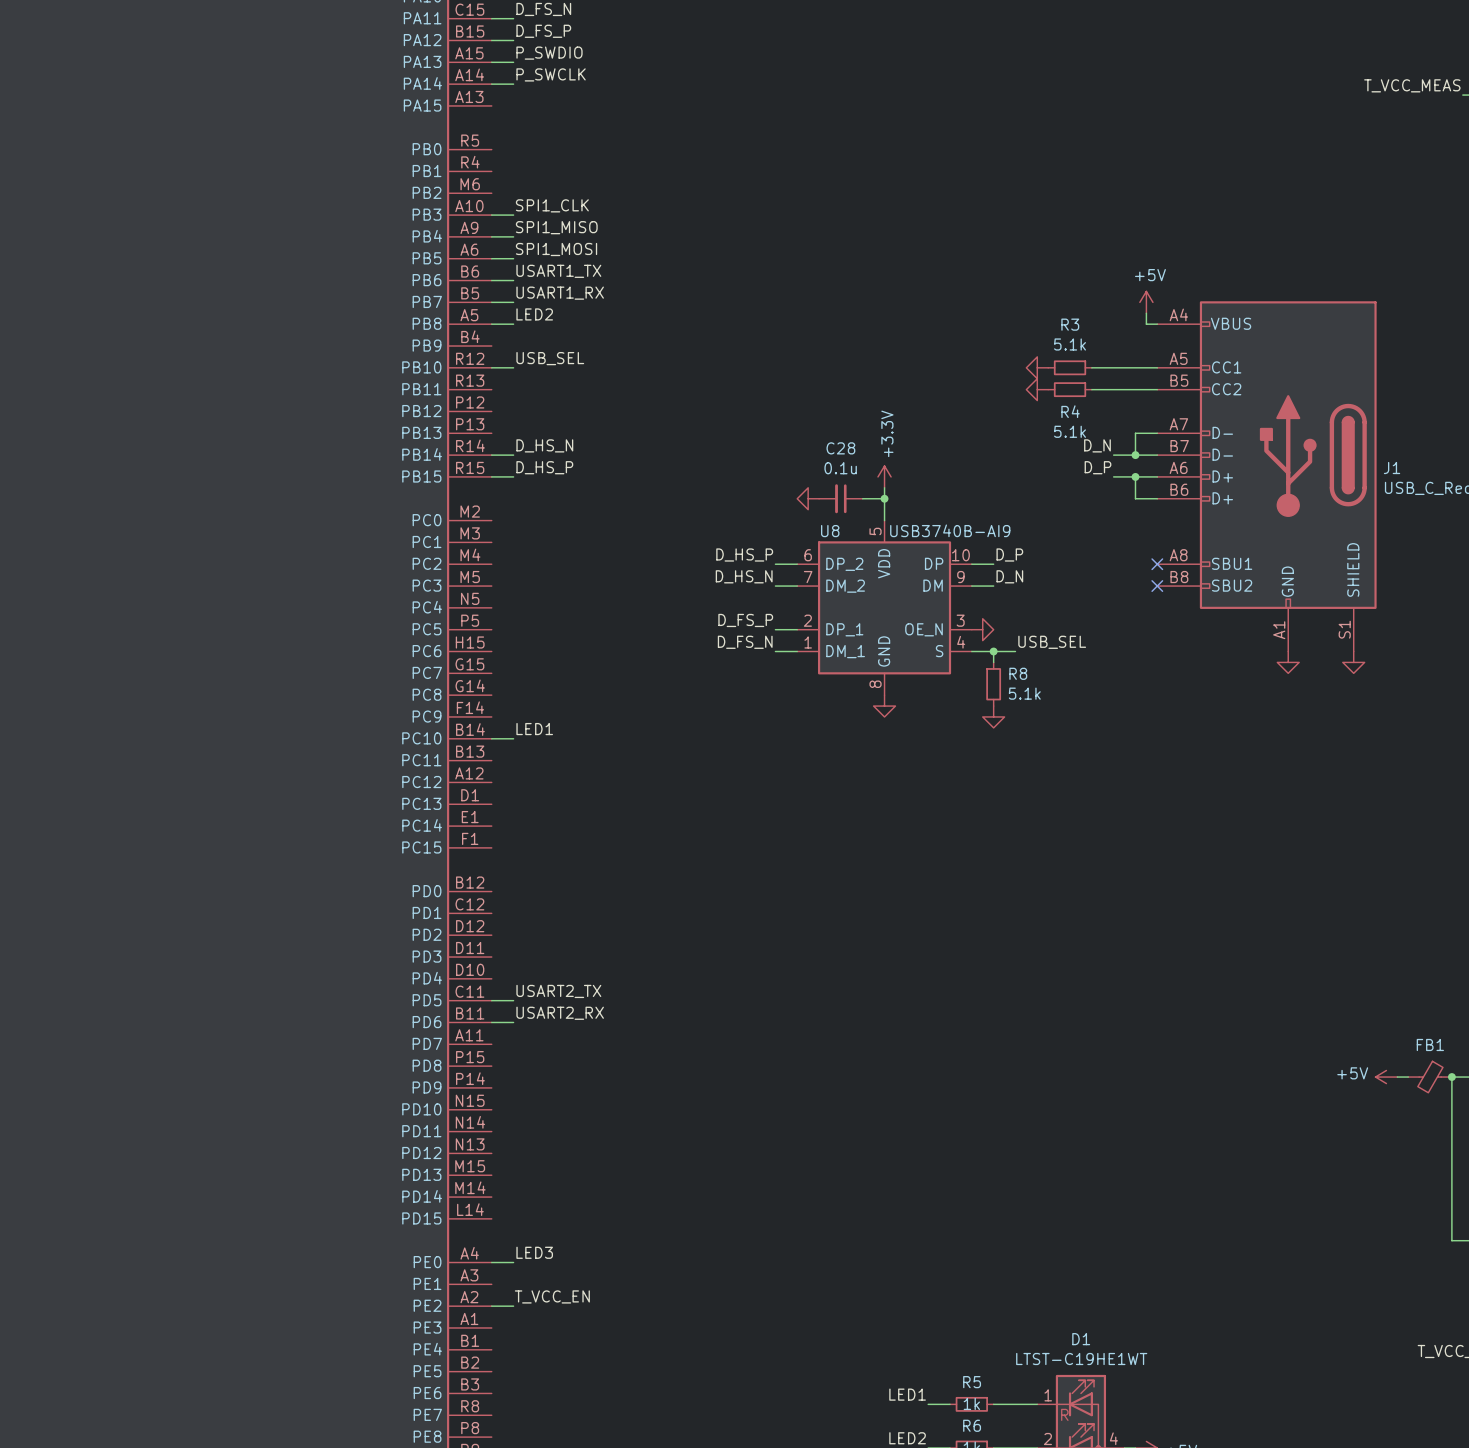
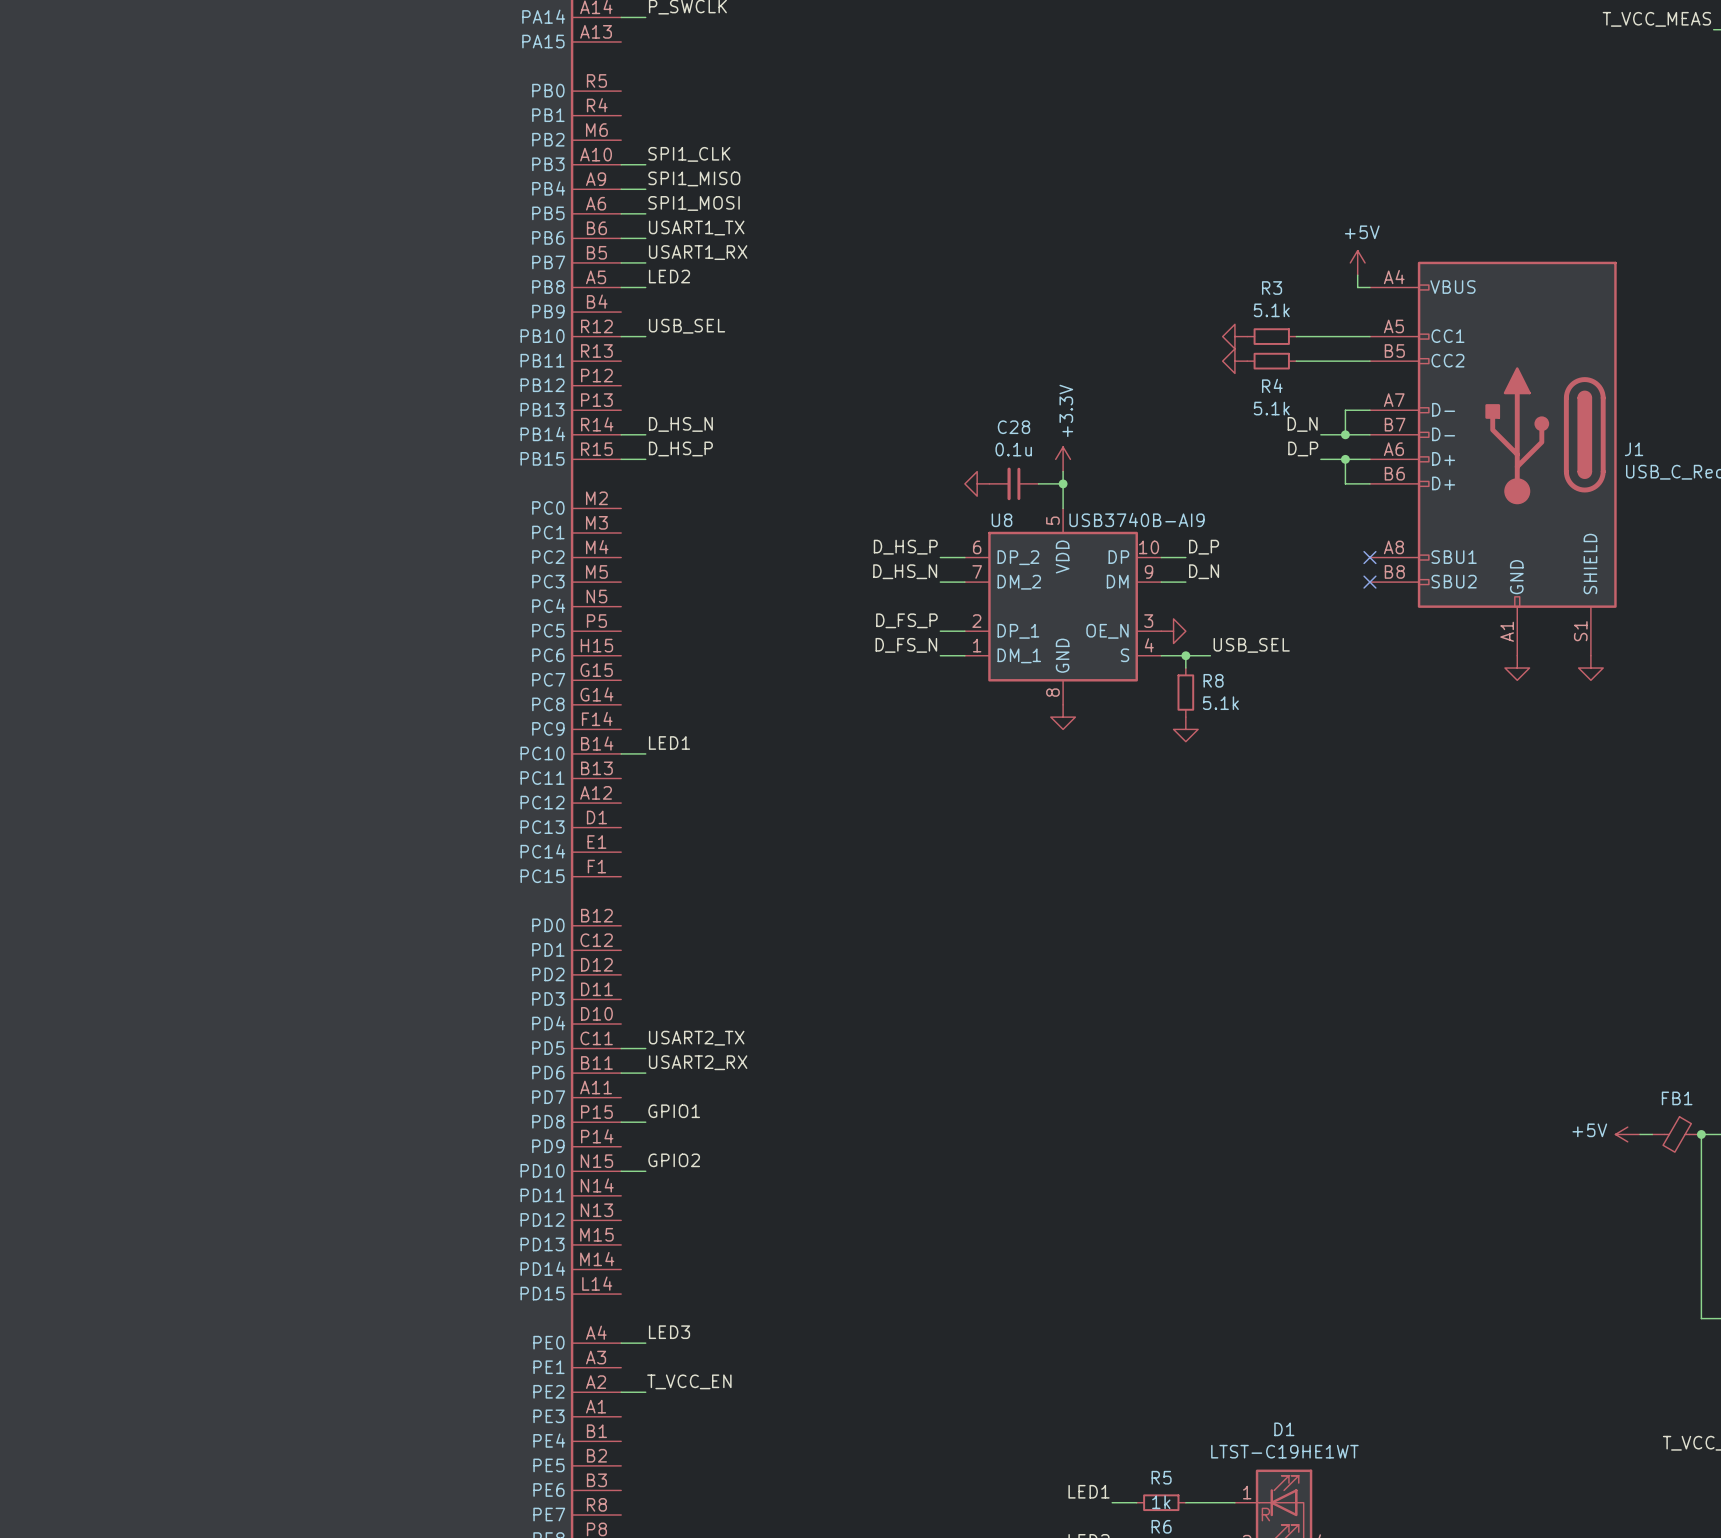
label: none -> GPIO1 (674, 1111)
wire: none -> (621, 1122) (645, 1122)
label: none -> GPIO2 (674, 1160)
wire: none -> (621, 1171) (645, 1171)

